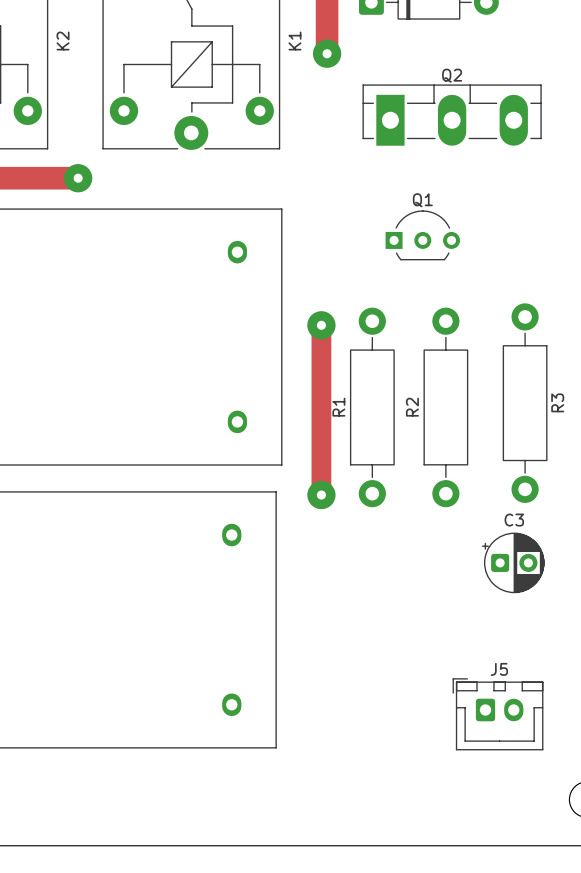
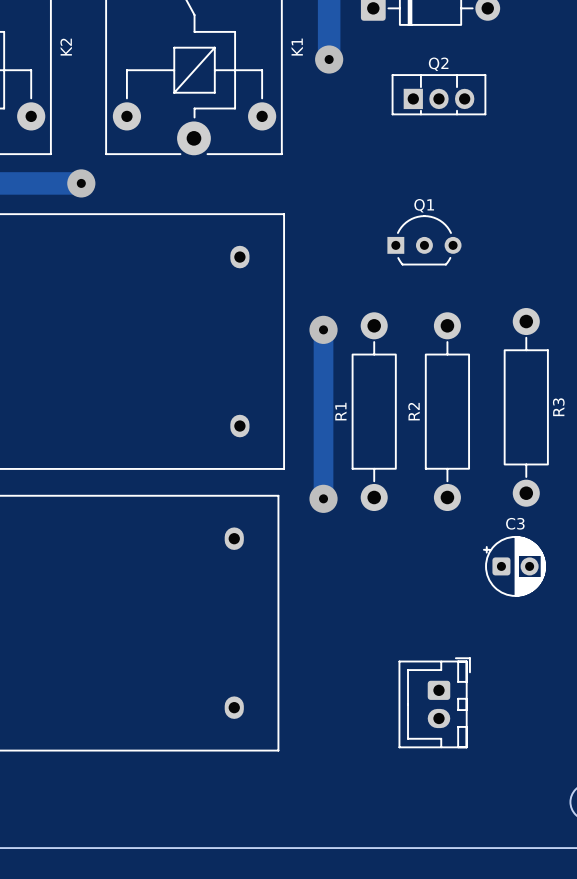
Q2 footprint: [362, 84, 542, 146] -> [391, 74, 487, 116]
part: none -> (434, 702)
J5: (497, 714) -> none

